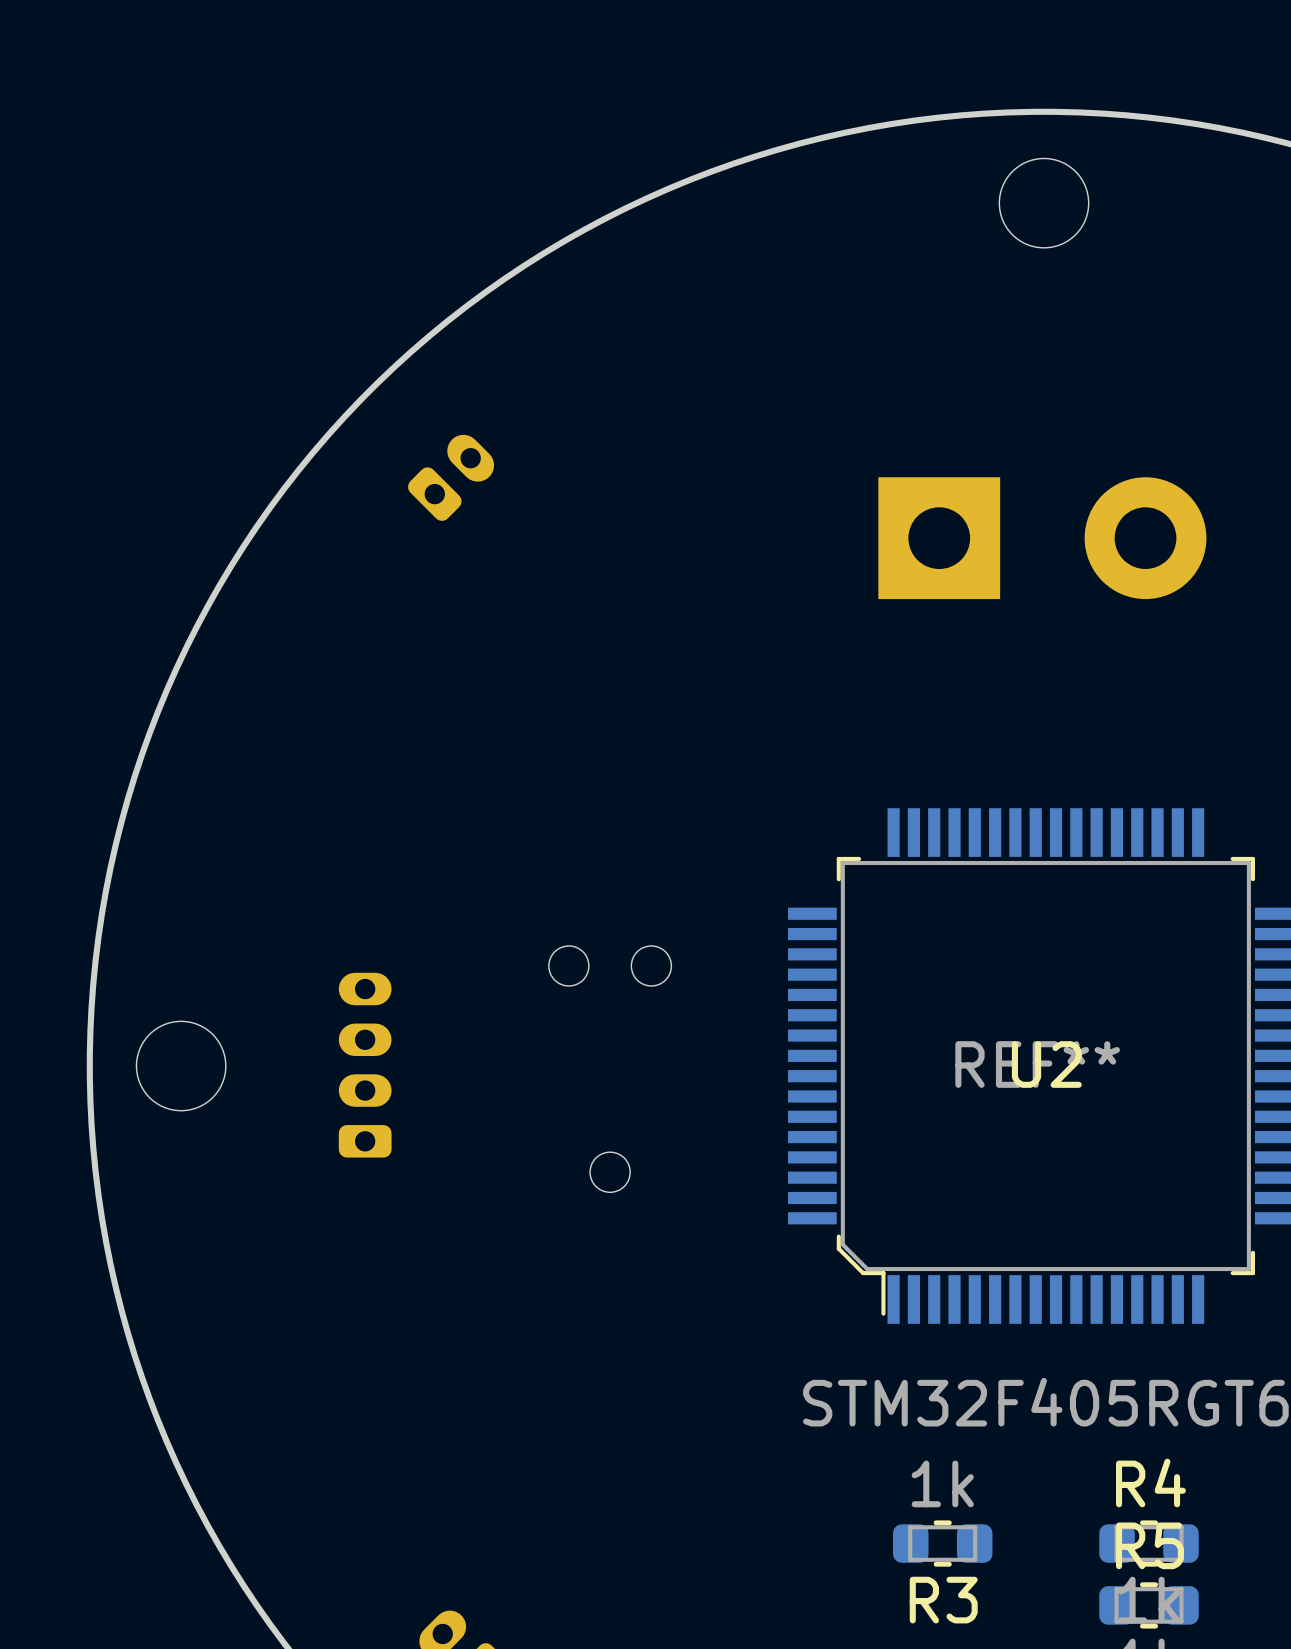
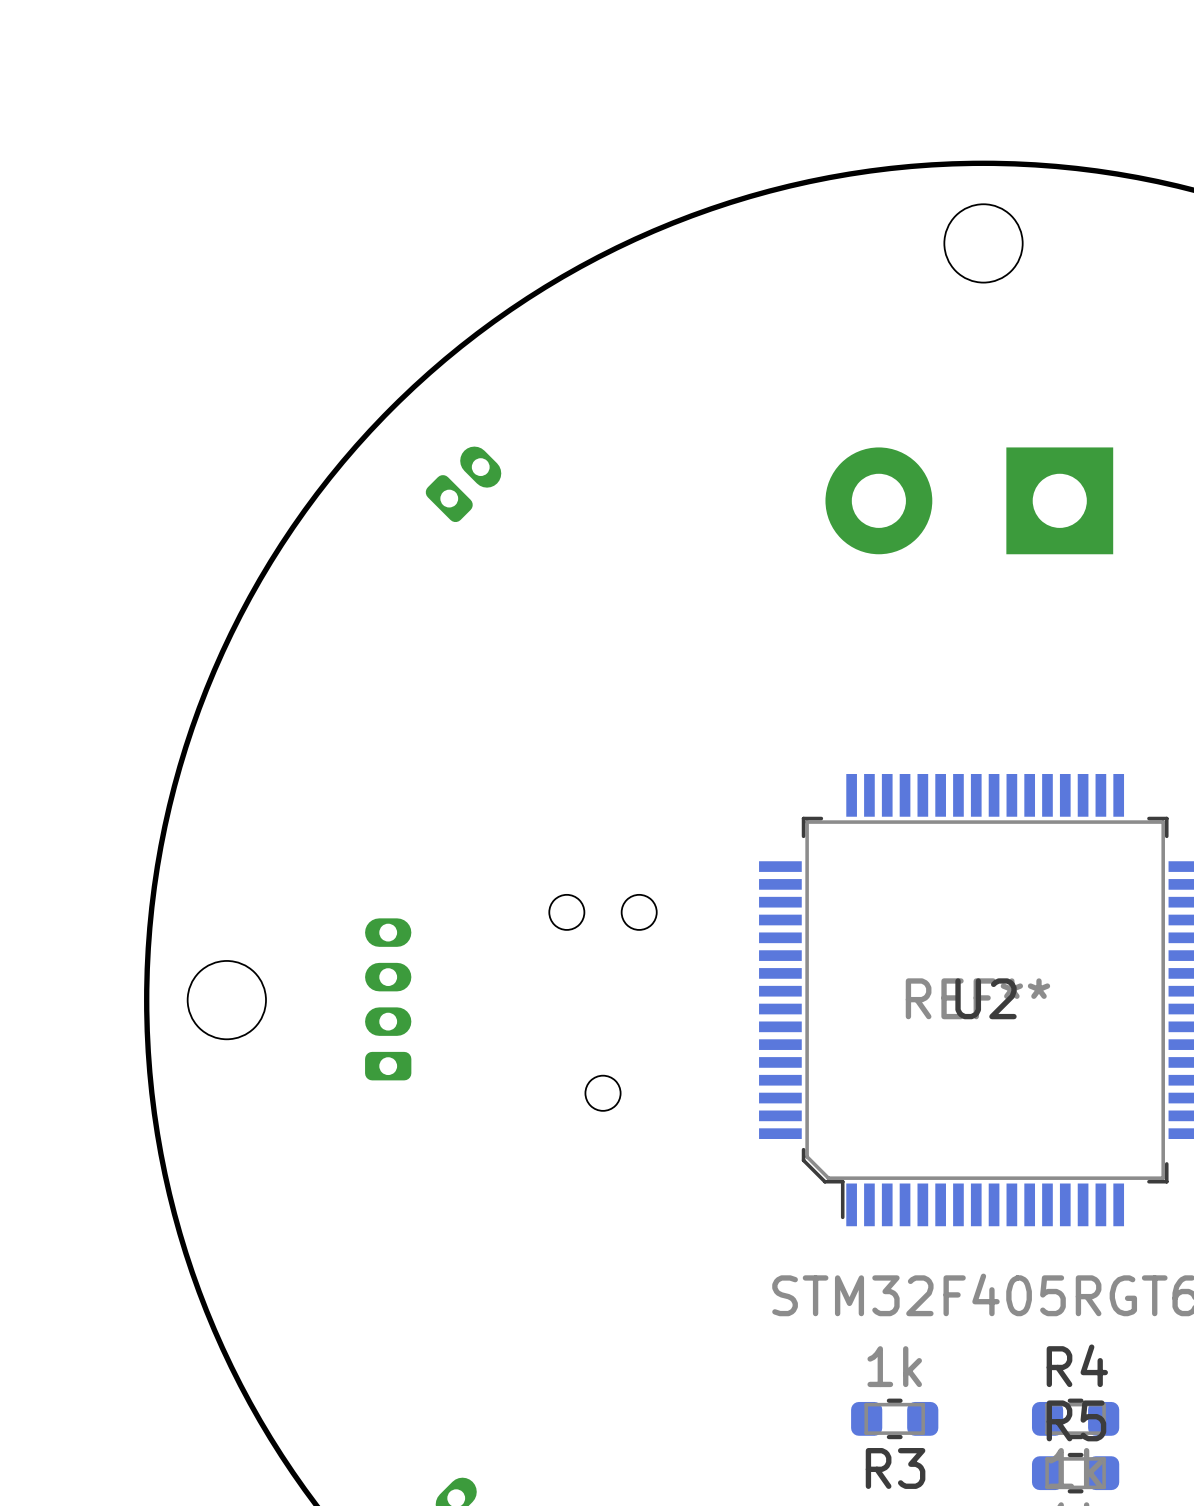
part rotation: 0° (1042, 538) -> 180° (969, 500)

